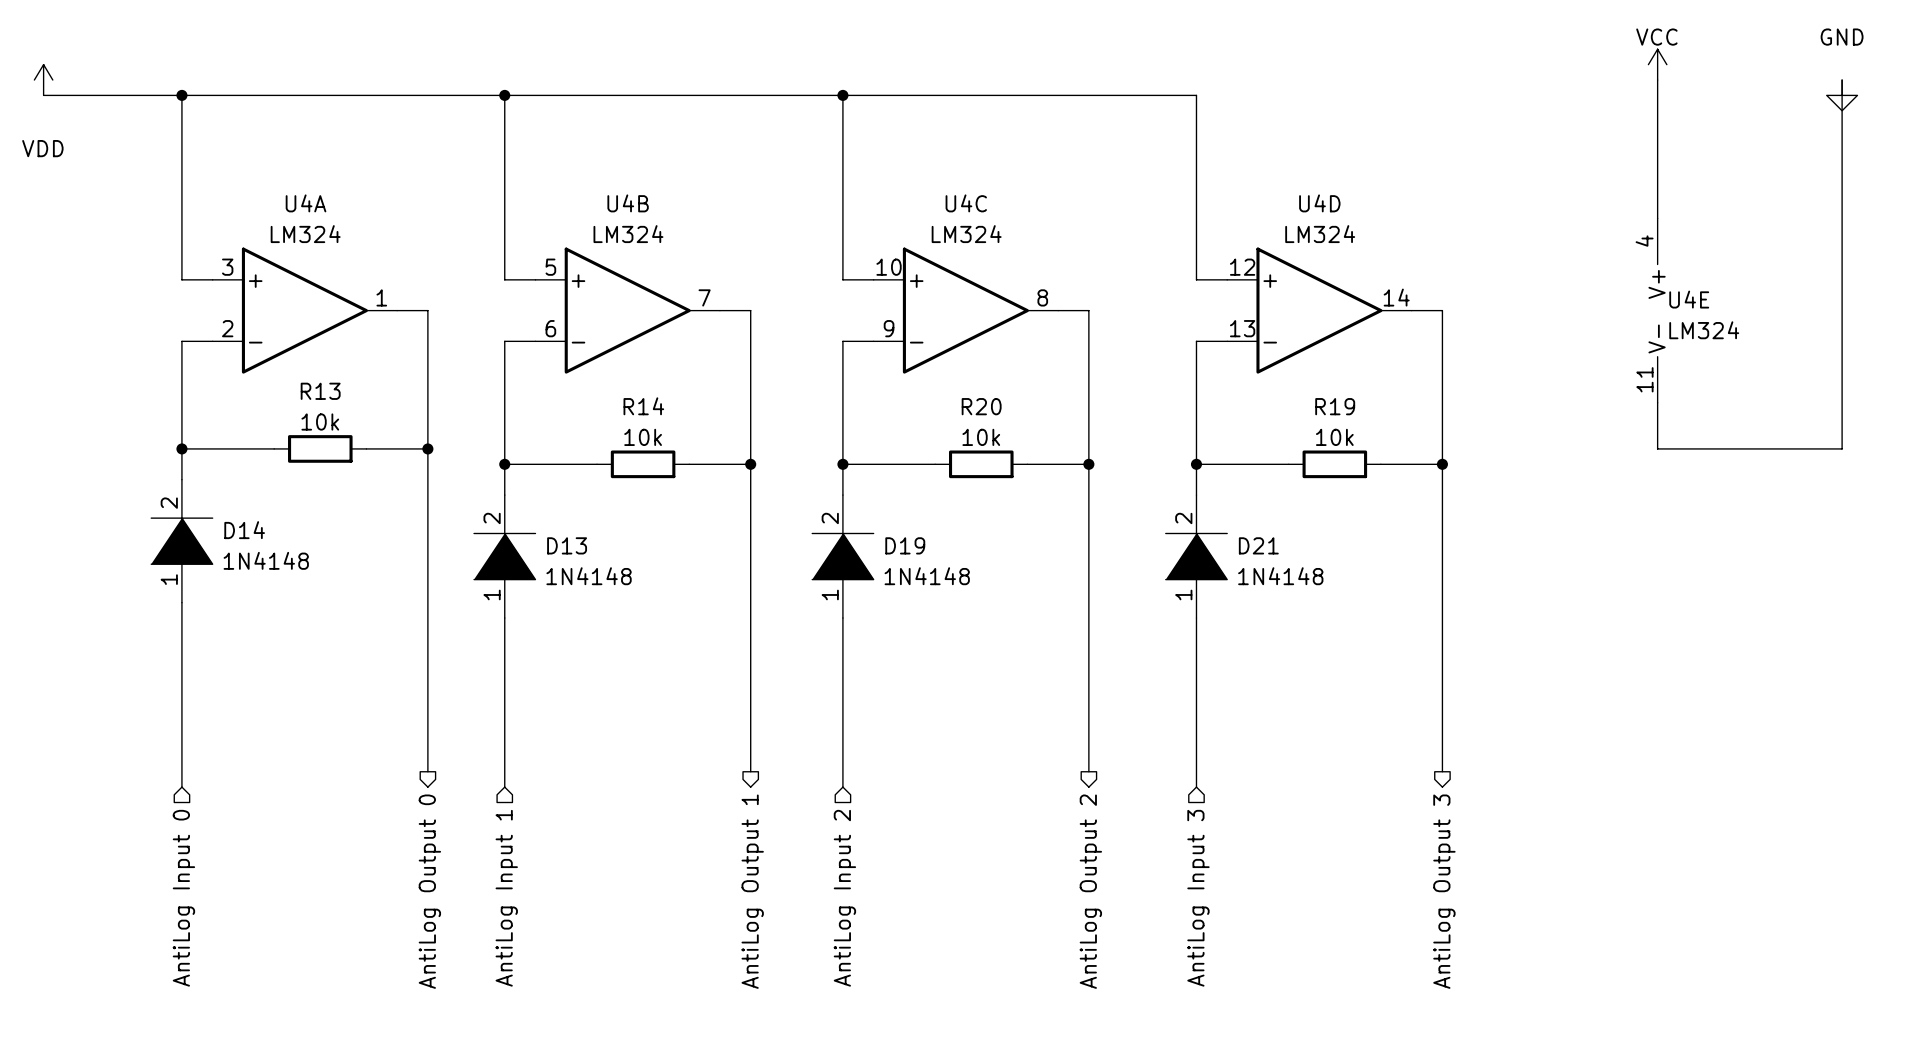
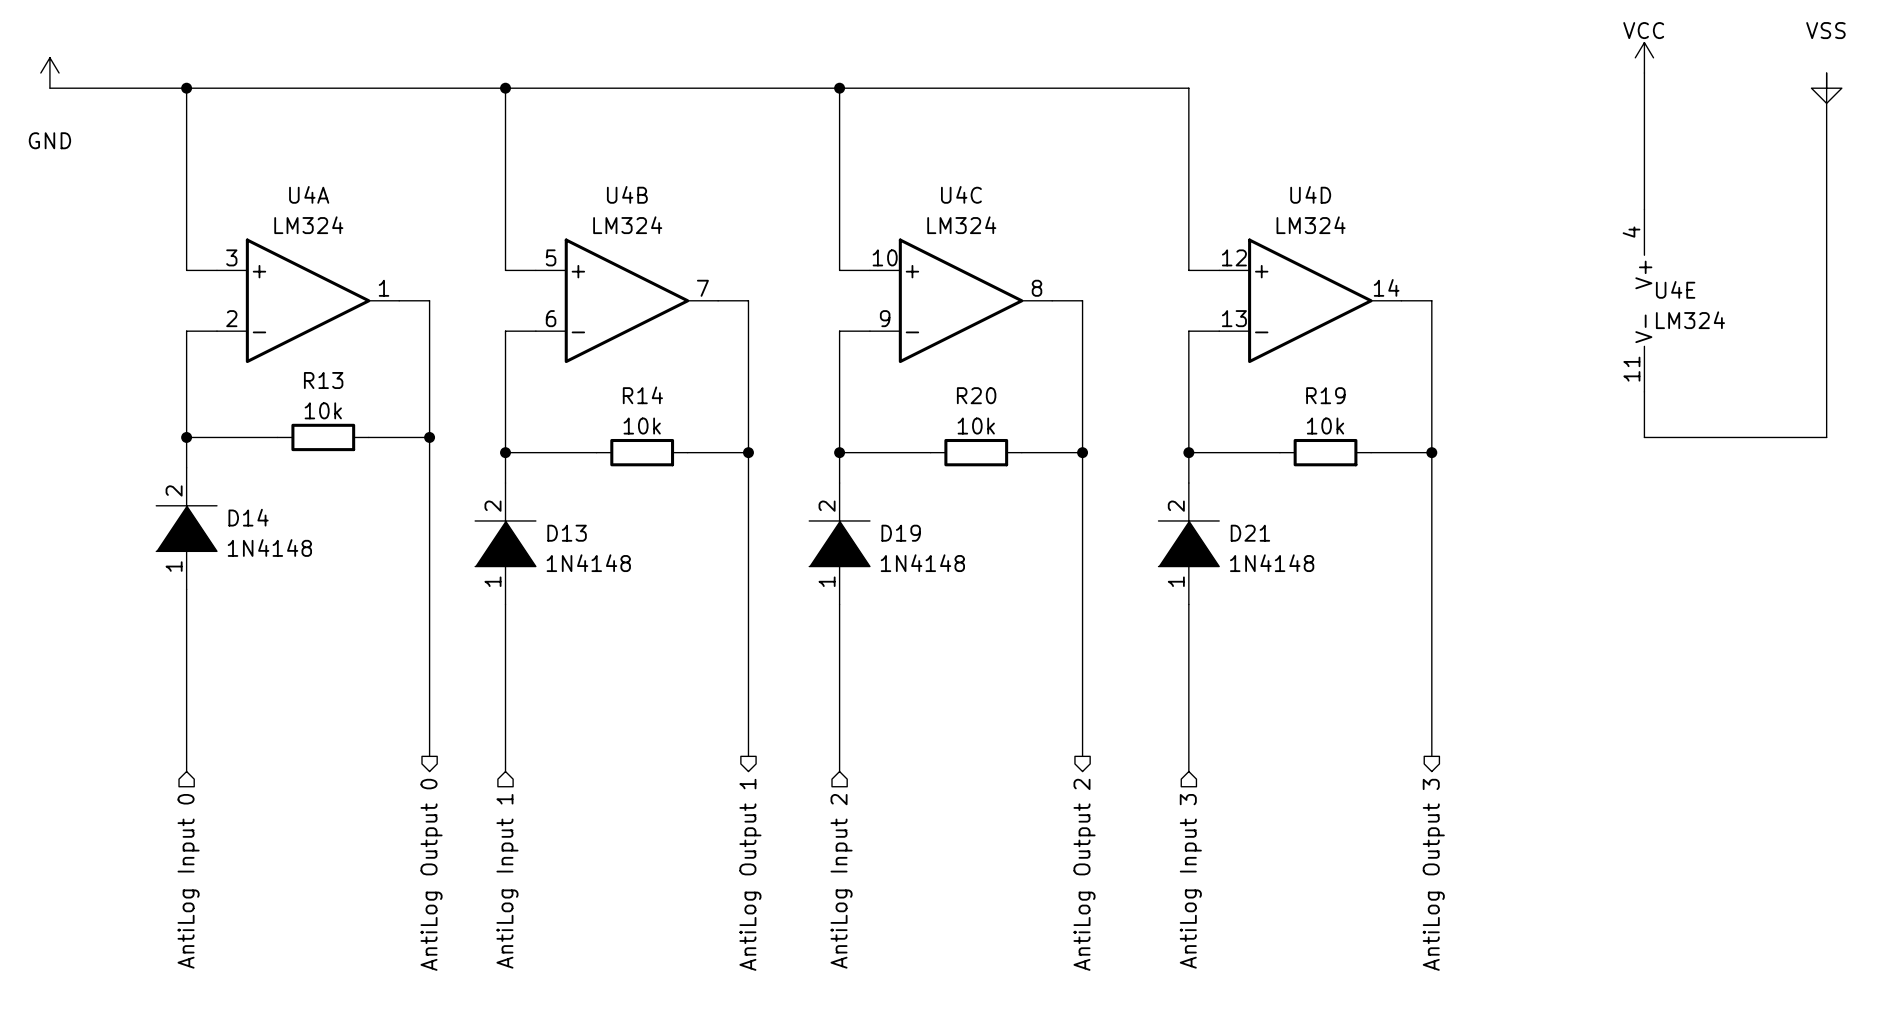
power symbol: VDD (43, 80) -> GND (49, 73)
power symbol: GND (1842, 95) -> VSS (1826, 88)

